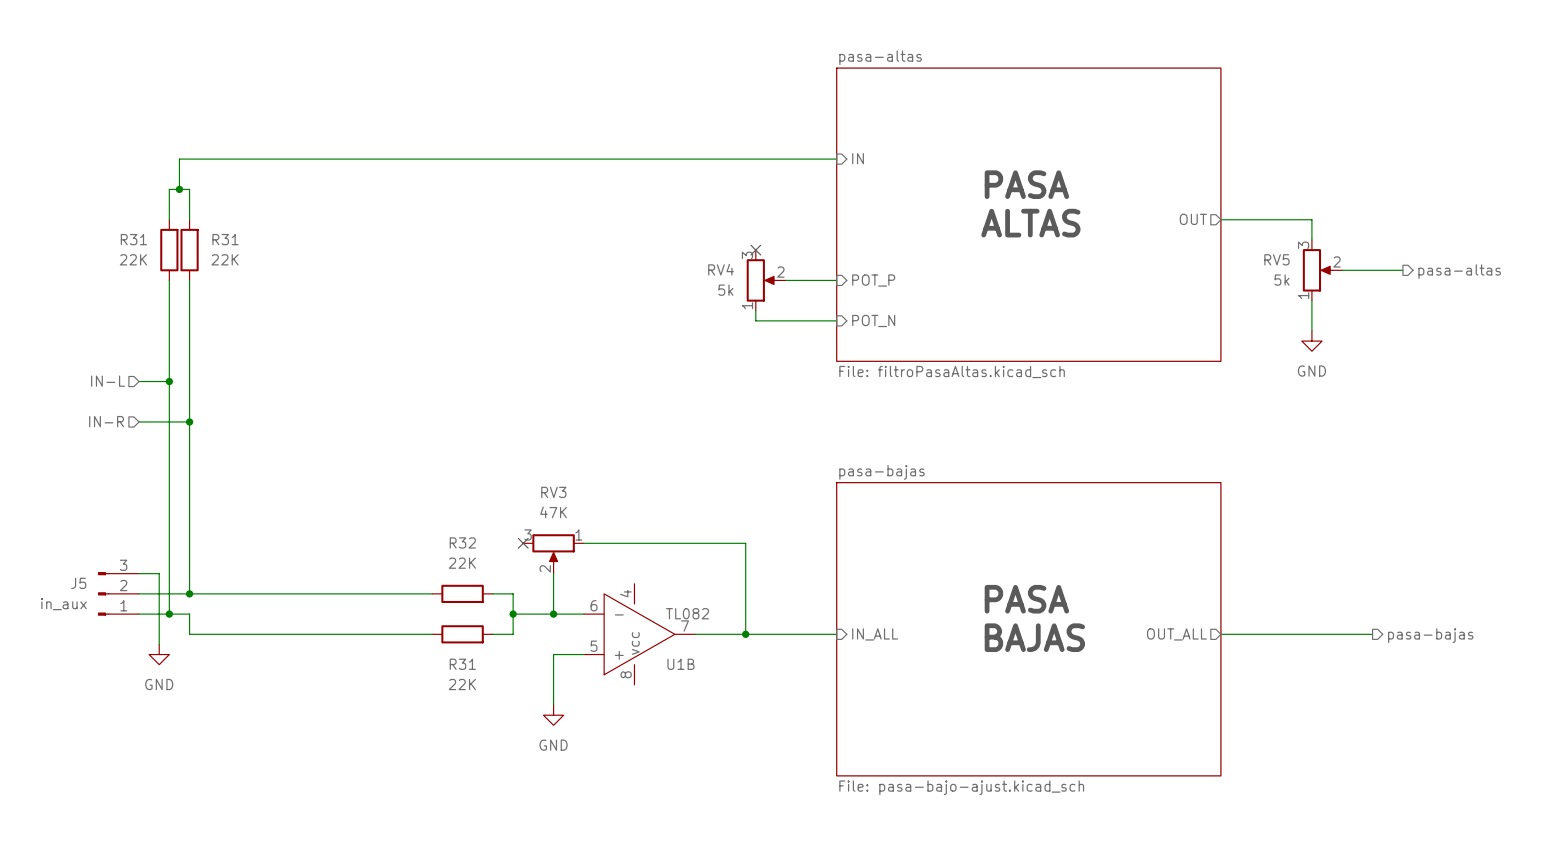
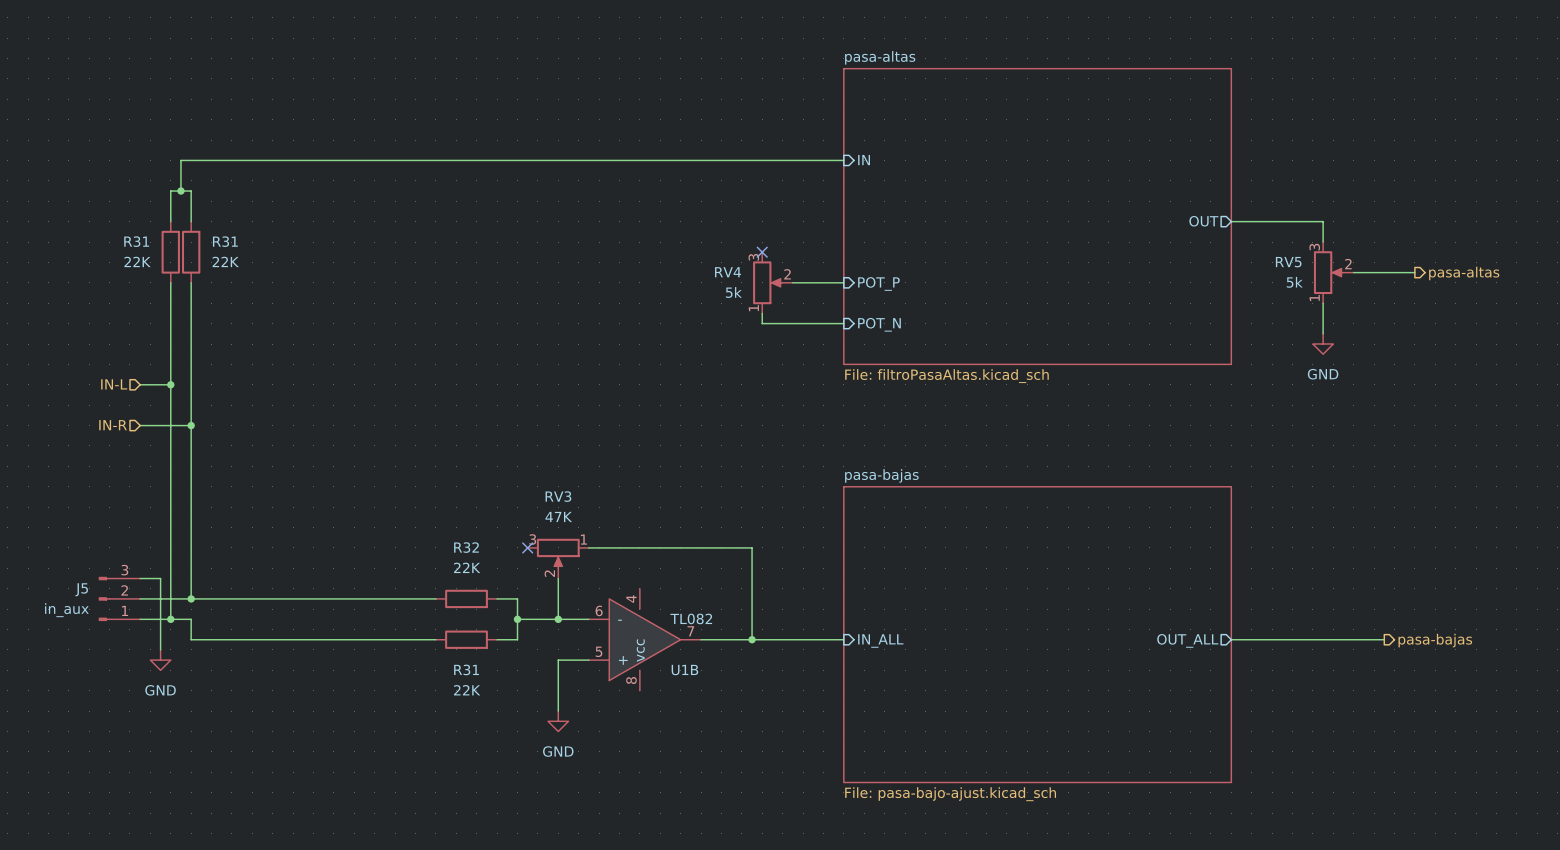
text: PASA (1026, 184) -> none
text: ALTAS (1030, 223) -> none
text: PASA (1026, 599) -> none
text: BAJAS (1034, 637) -> none

